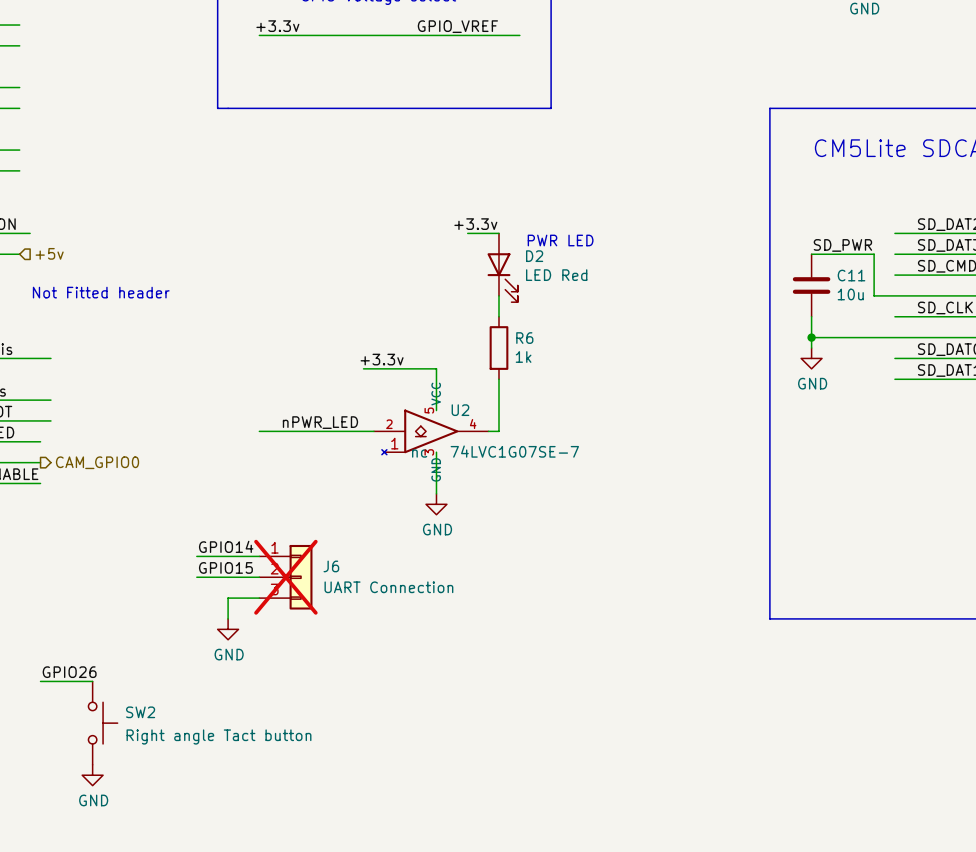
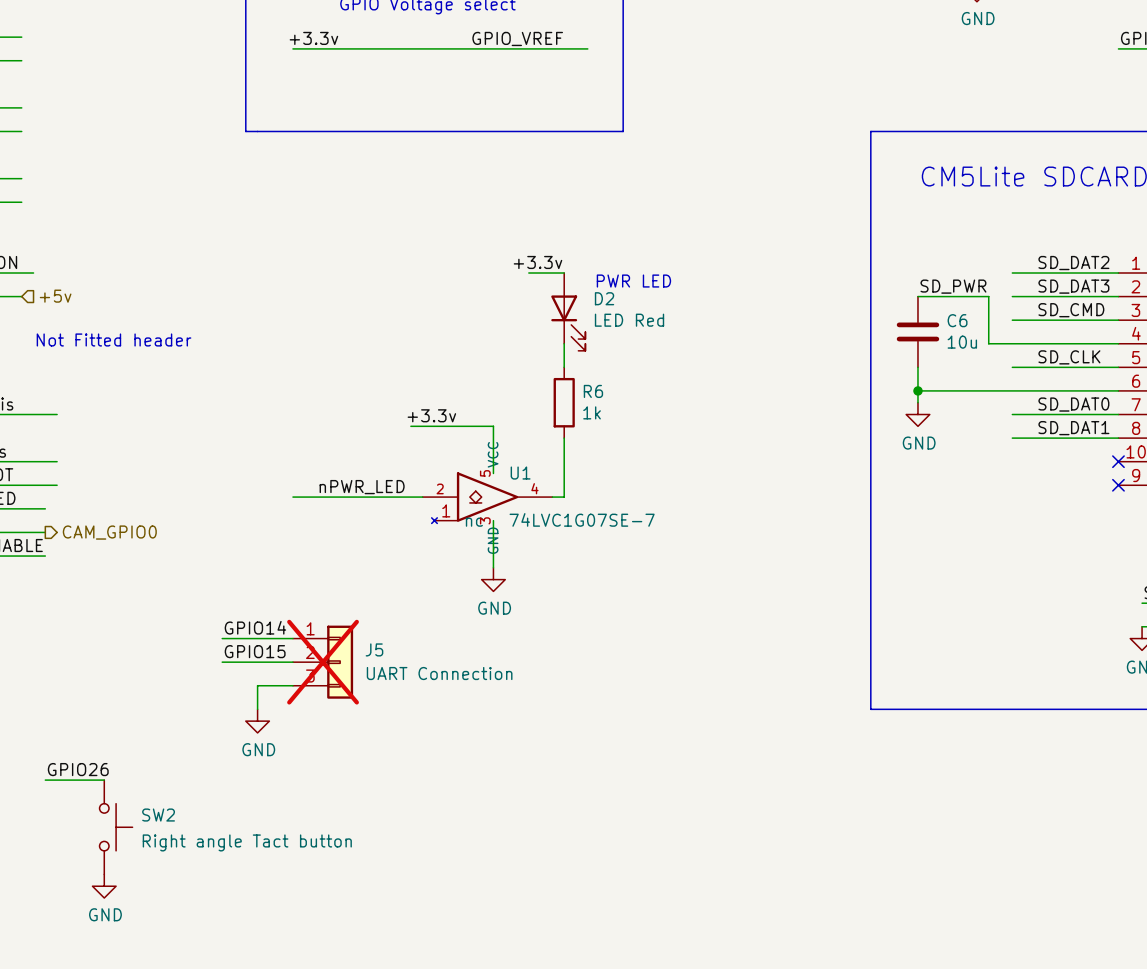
C11 name: C11 (851, 275) -> C6 (957, 320)
U2 name: U2 (460, 410) -> U1 (520, 473)
J6 name: J6 (331, 566) -> J5 (374, 649)

